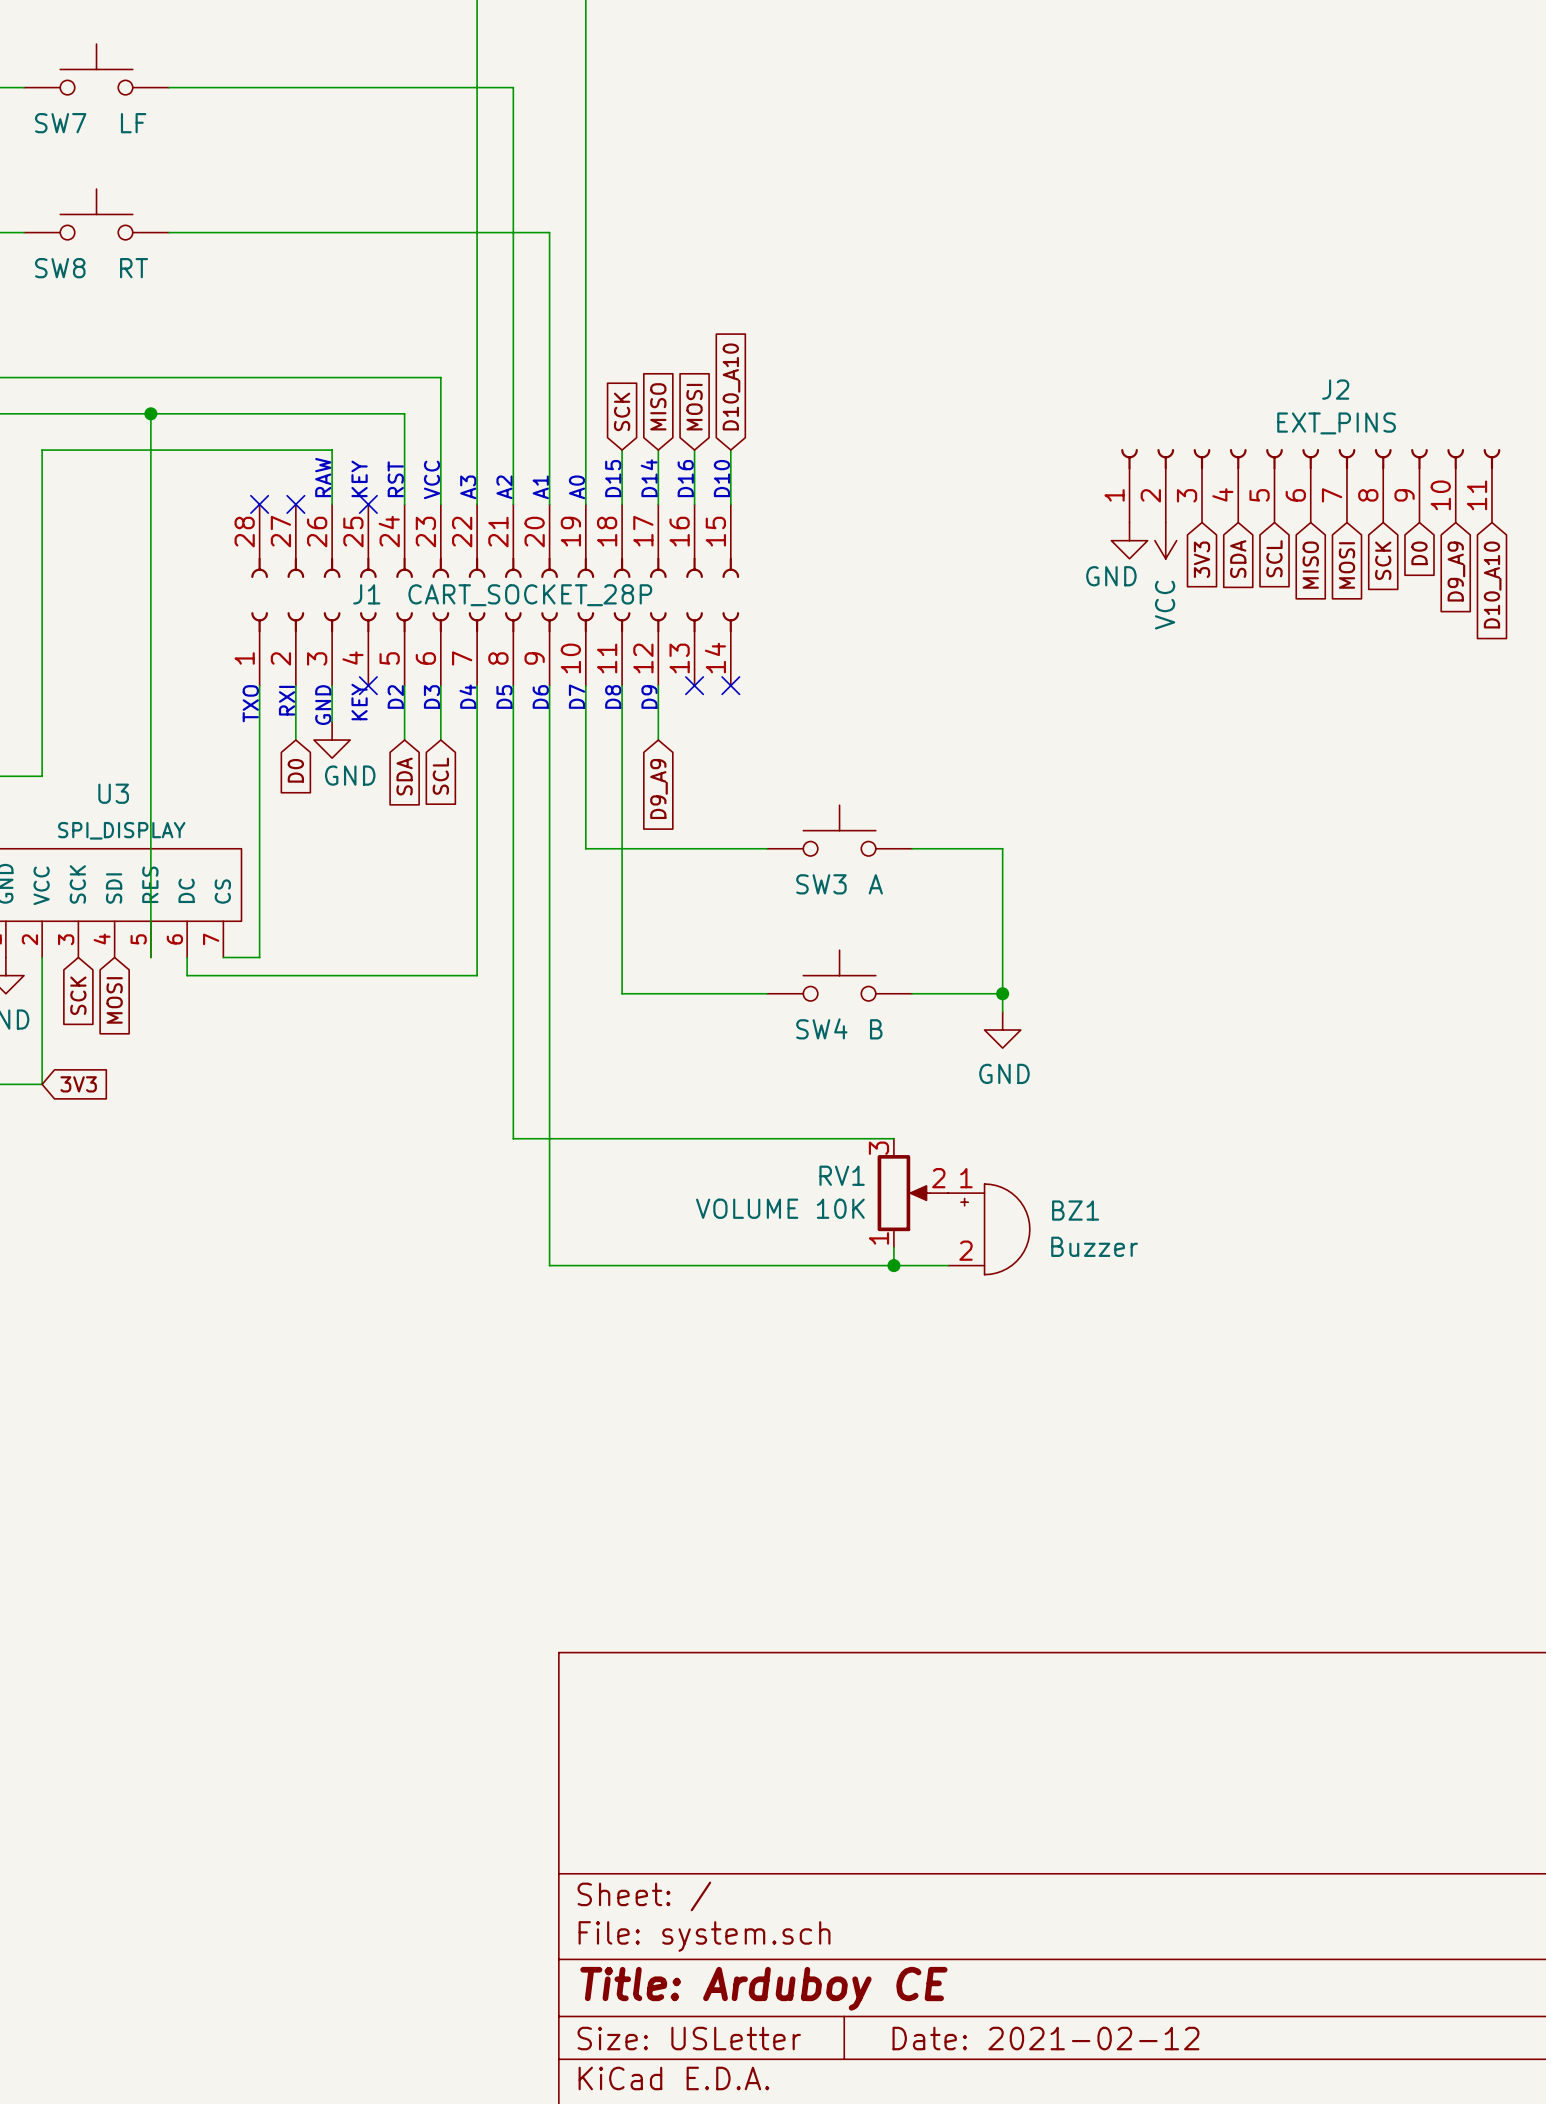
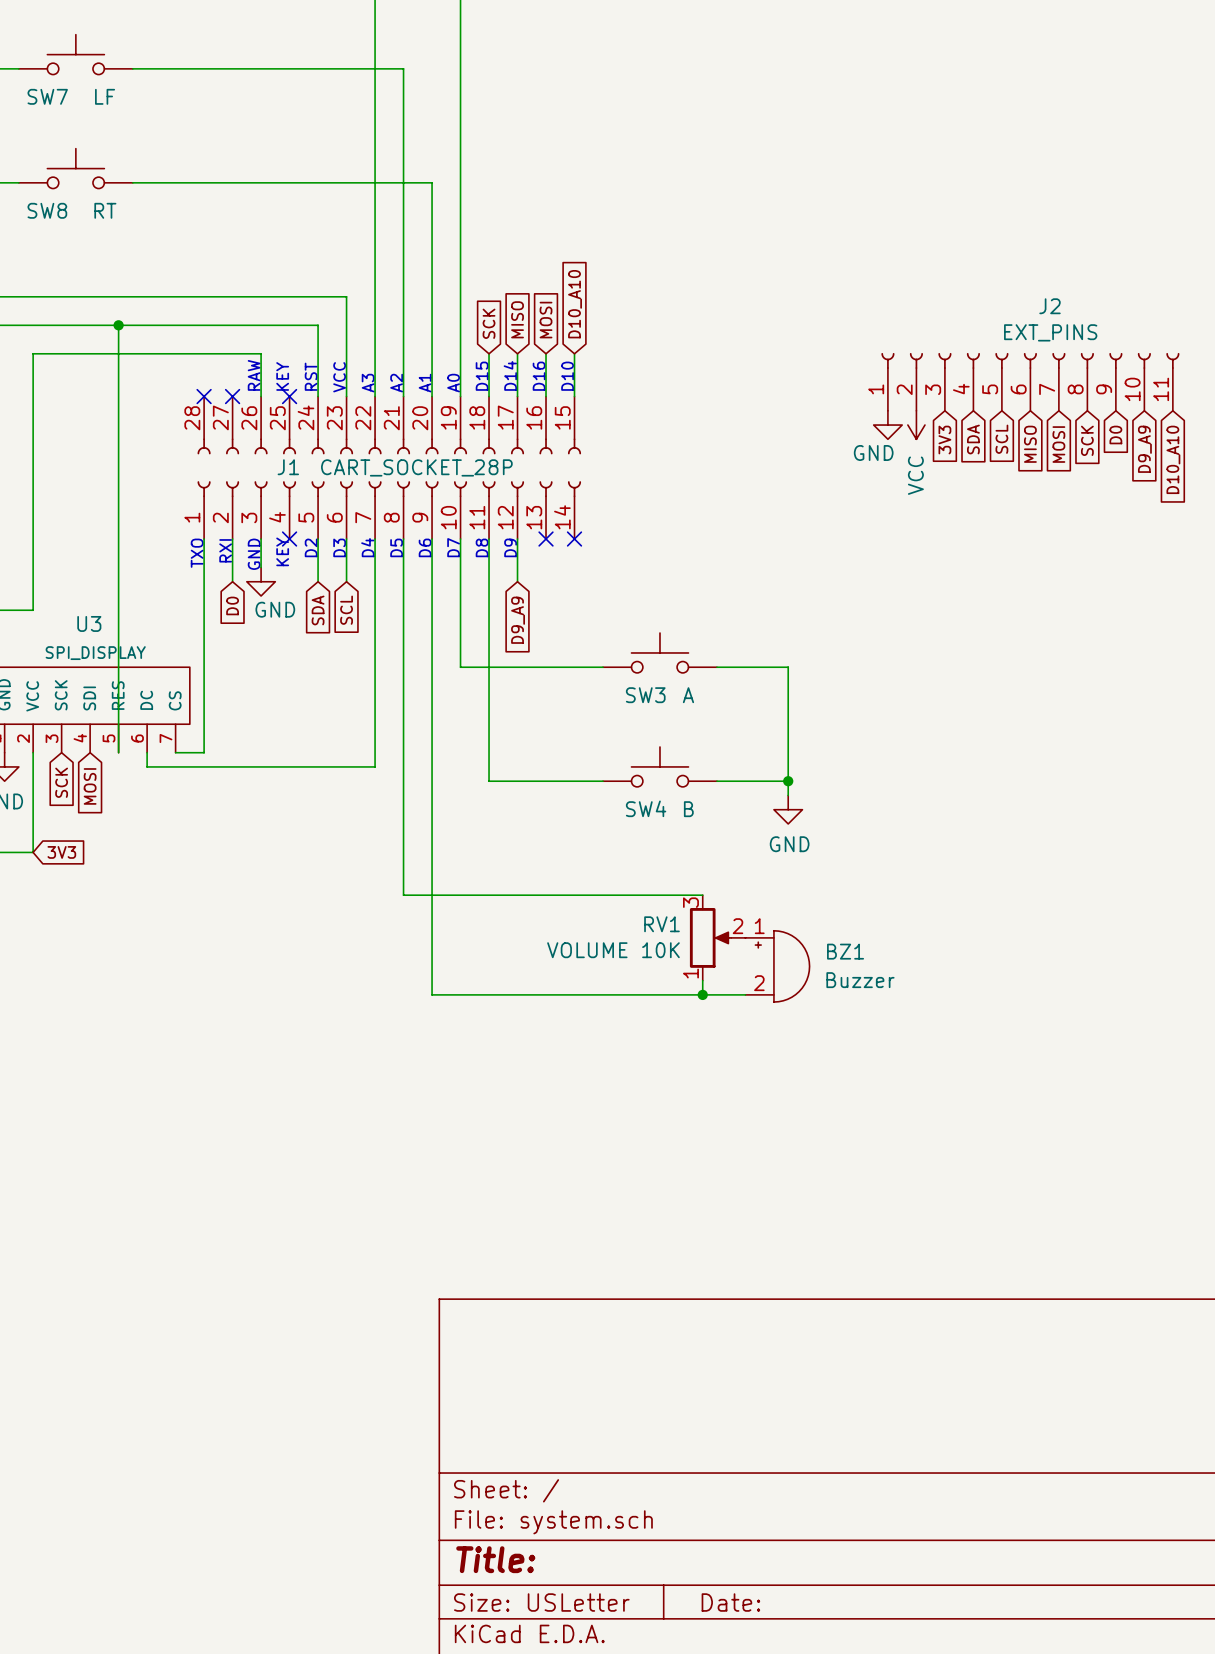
title block: Title: Arduboy CE (763, 1988) -> Title: (495, 1559)
title block: Date: 2021-02-12 (1045, 2038) -> Date: (730, 1602)

